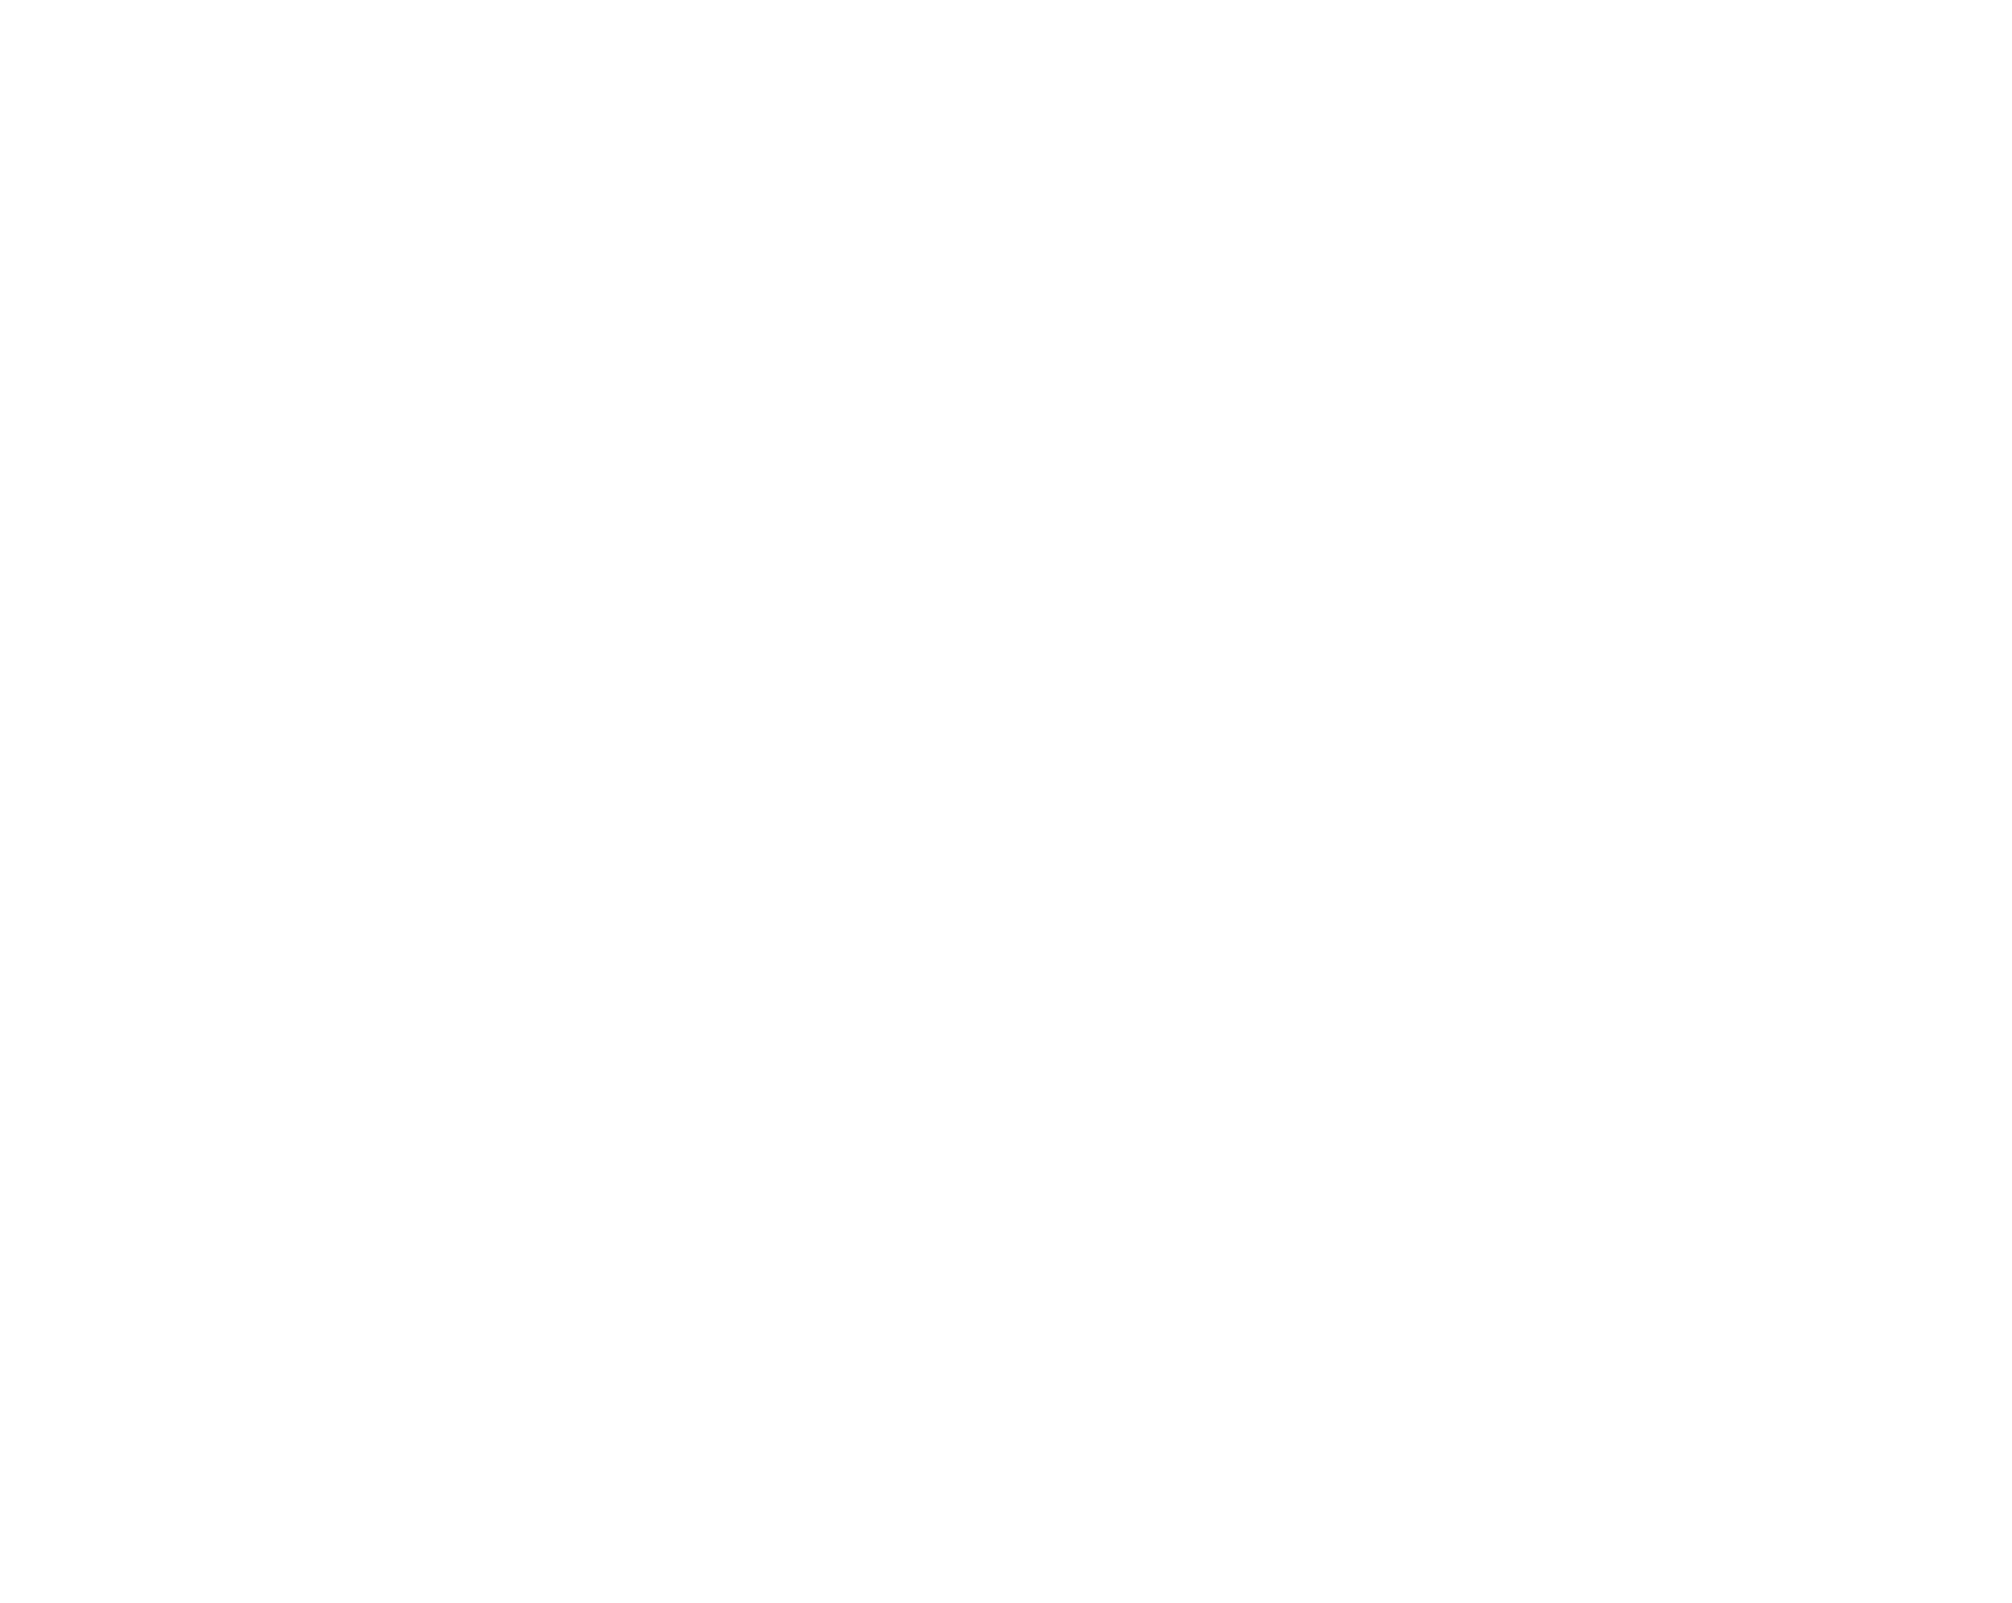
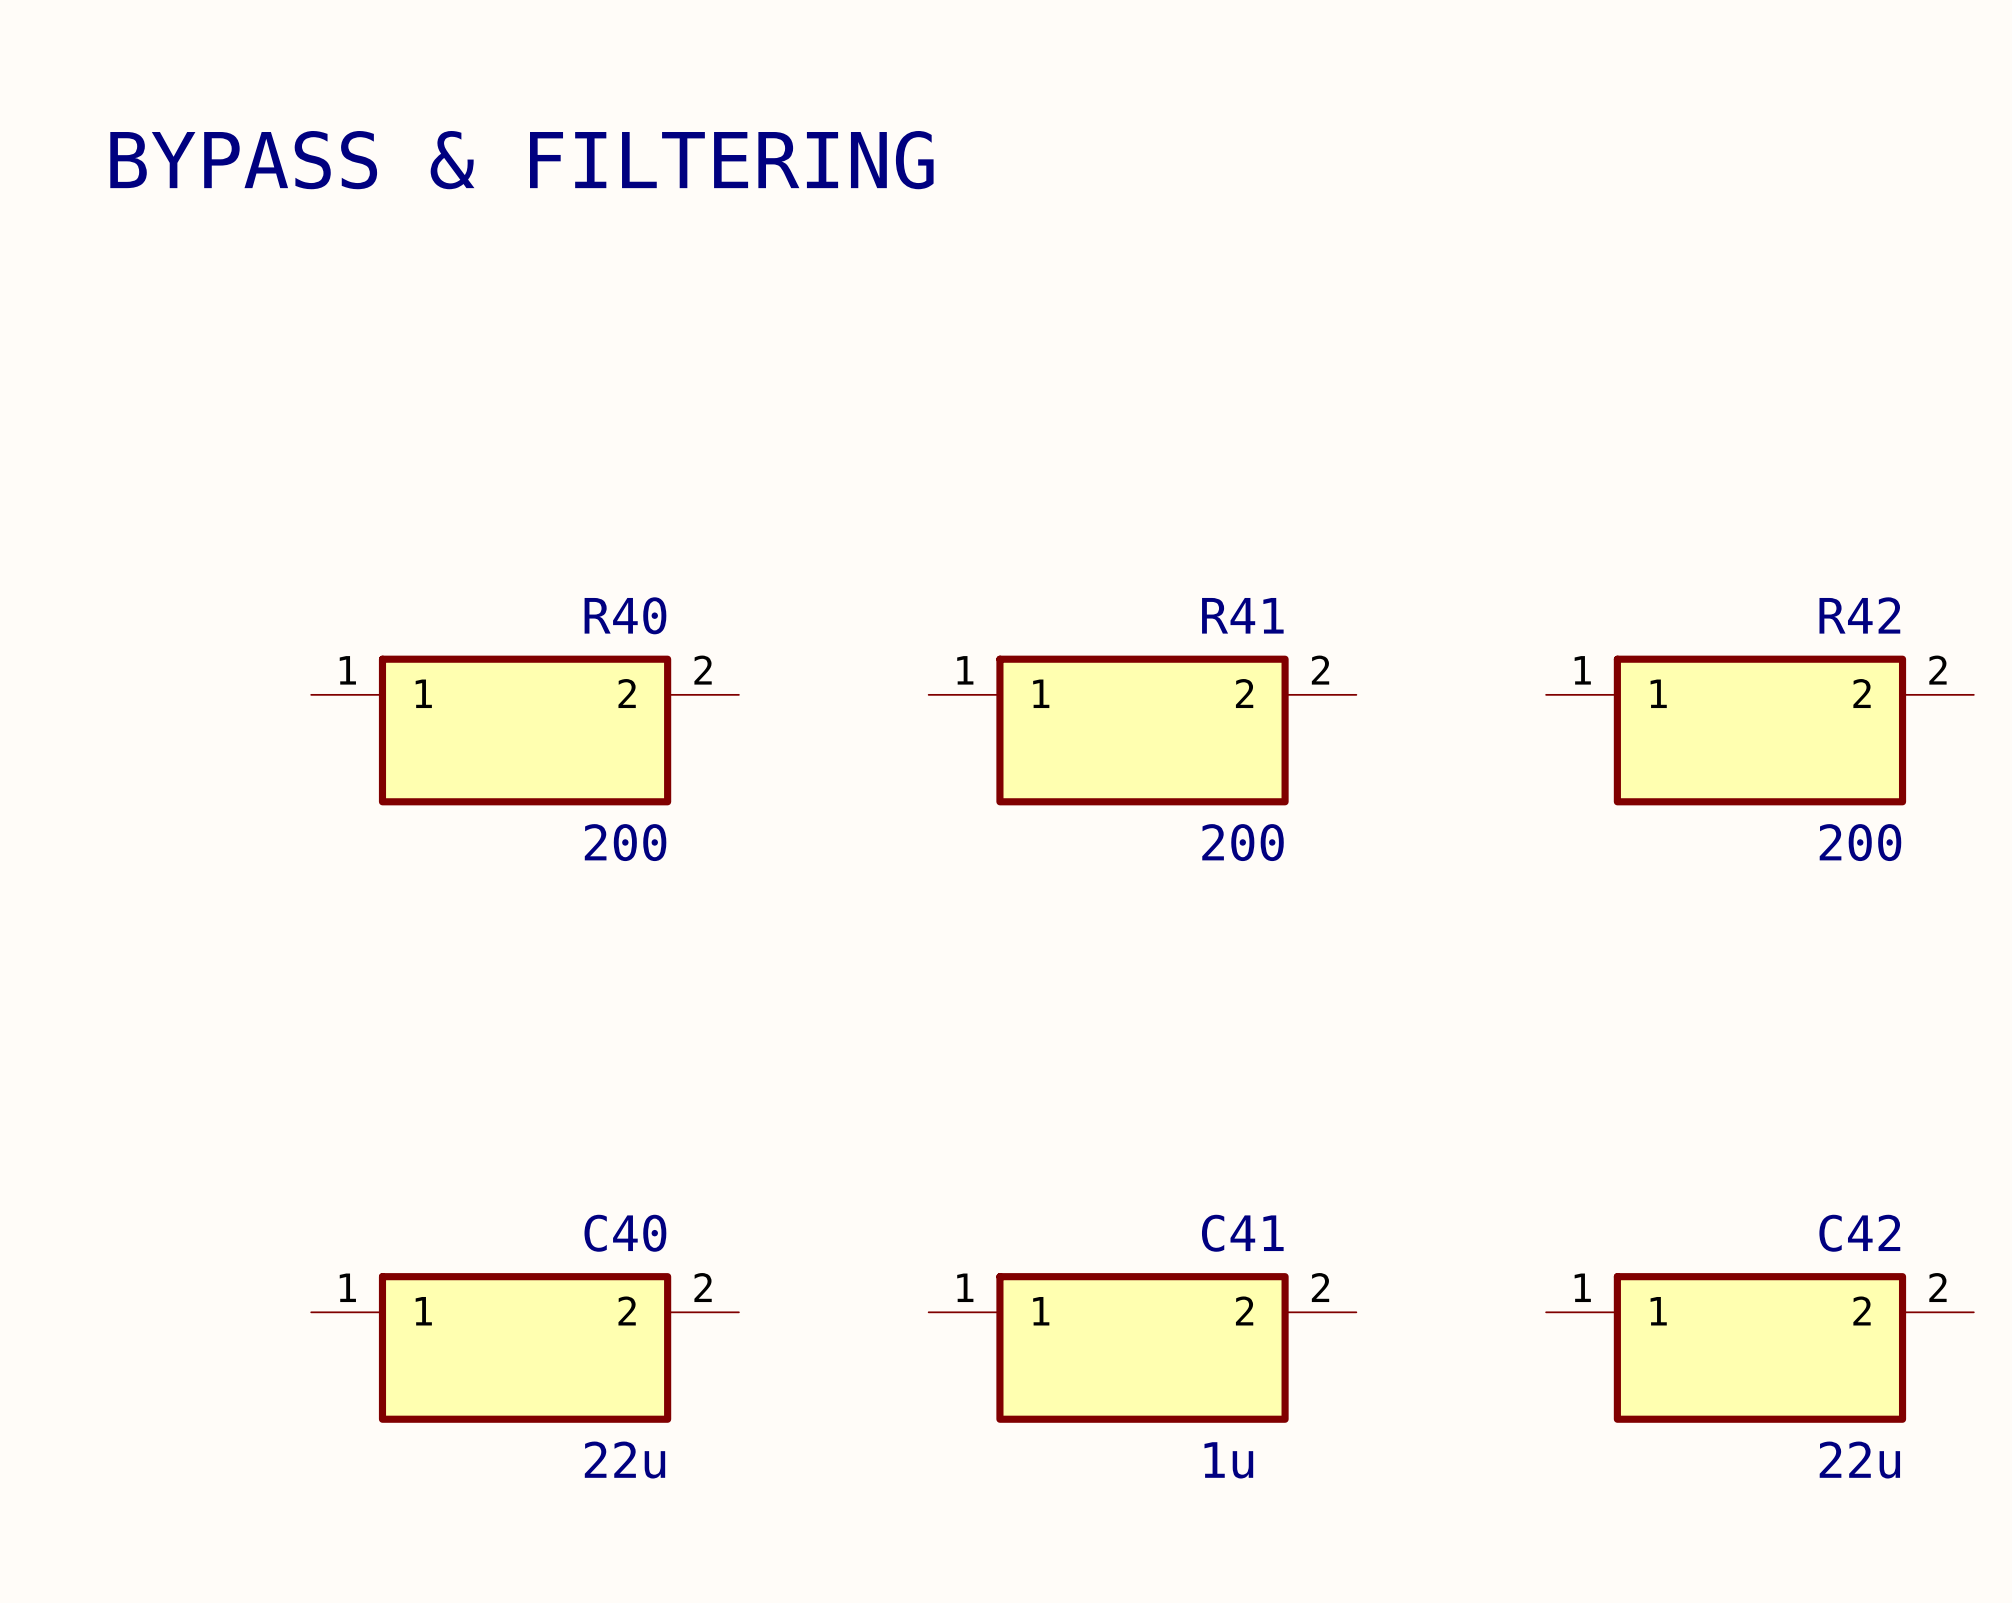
text: none -> BYPASS & FILTERING (521, 160)
R40: none -> 200 (525, 730)
R41: none -> 200 (1142, 730)
R42: none -> 200 (1759, 730)
C40: none -> 22u (525, 1347)
C41: none -> 1u (1142, 1347)
C42: none -> 22u (1759, 1347)

